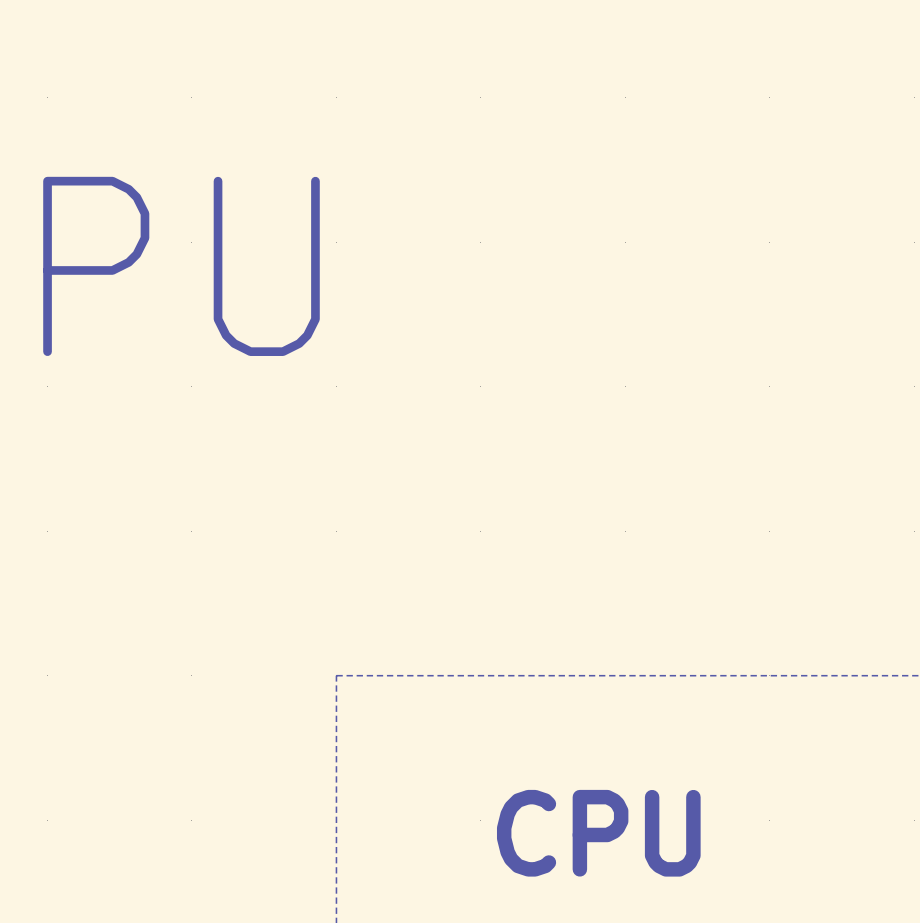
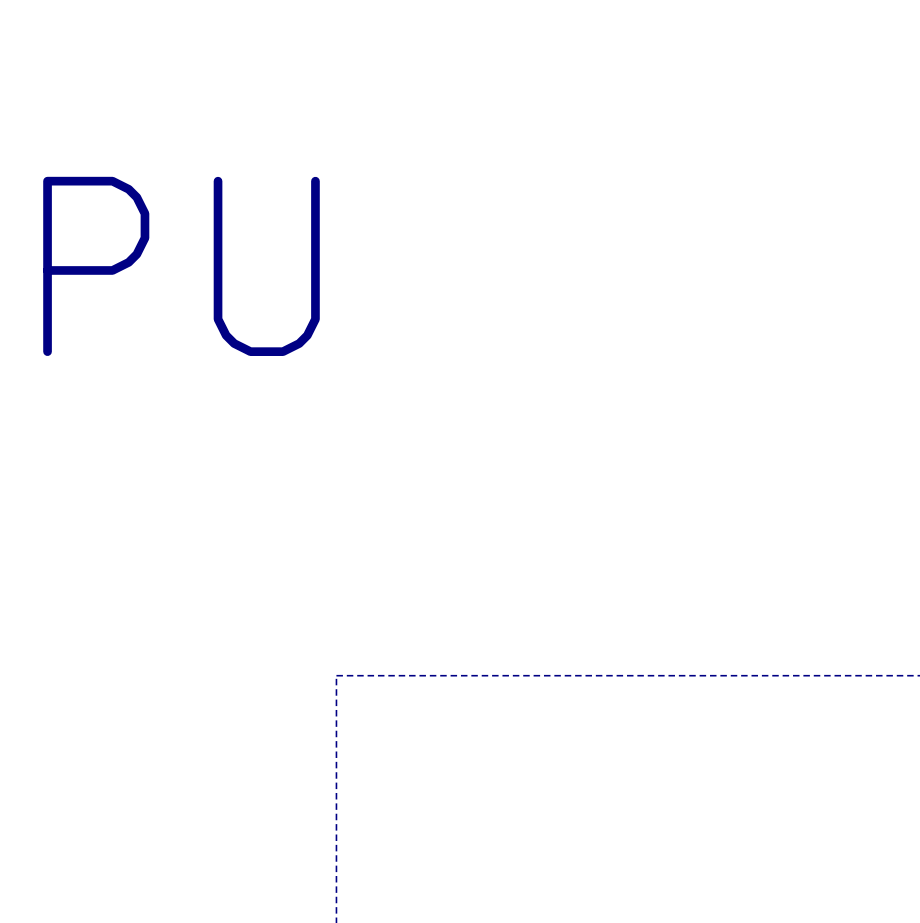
text: CPU (598, 833) -> none

